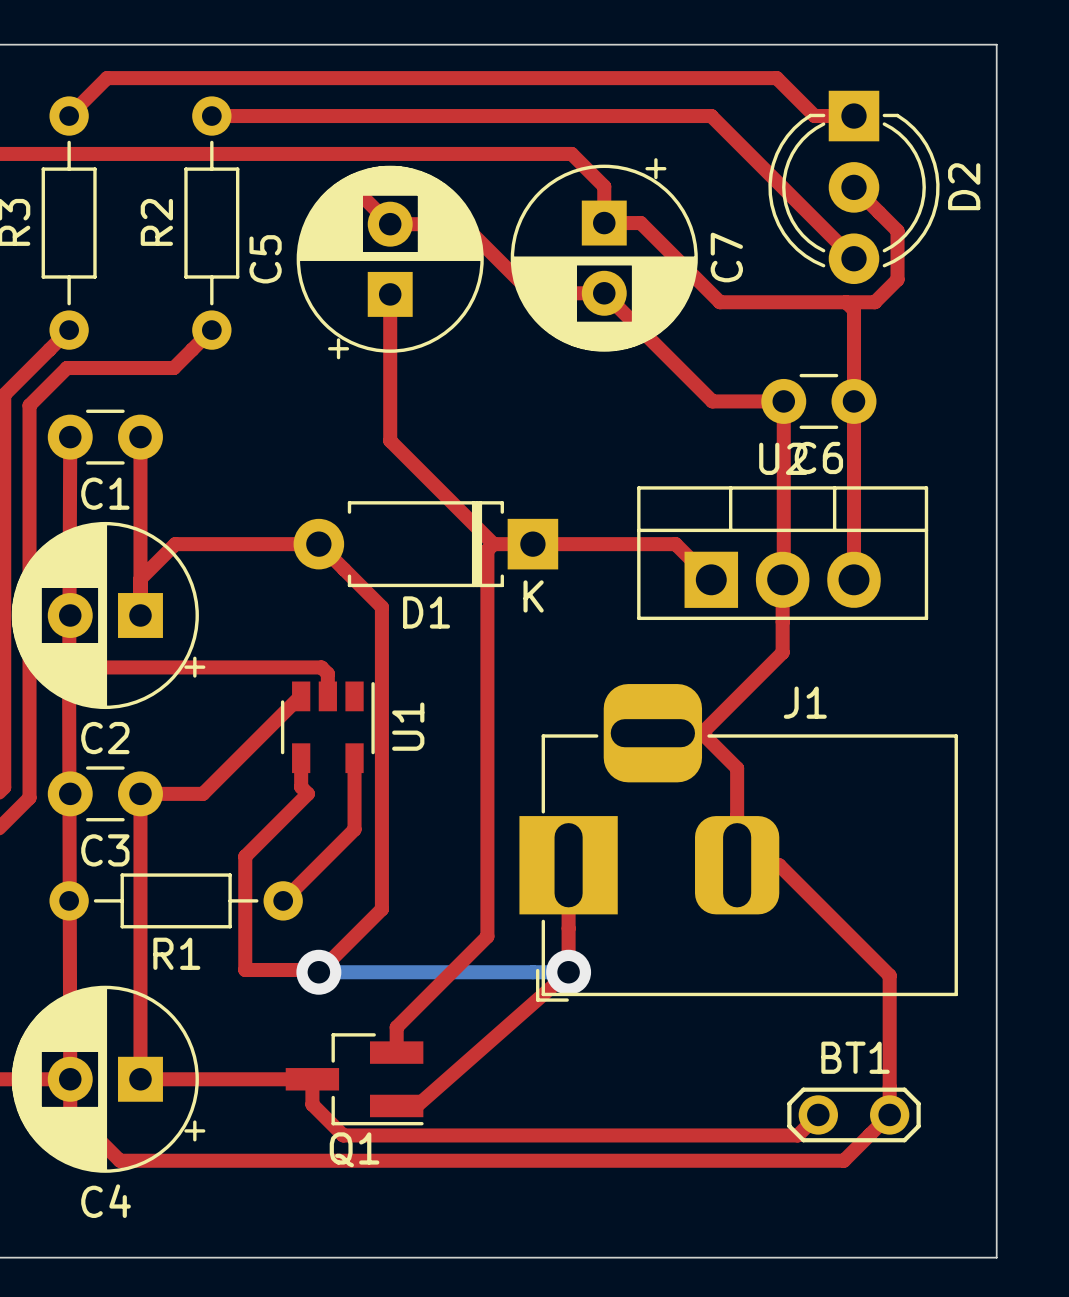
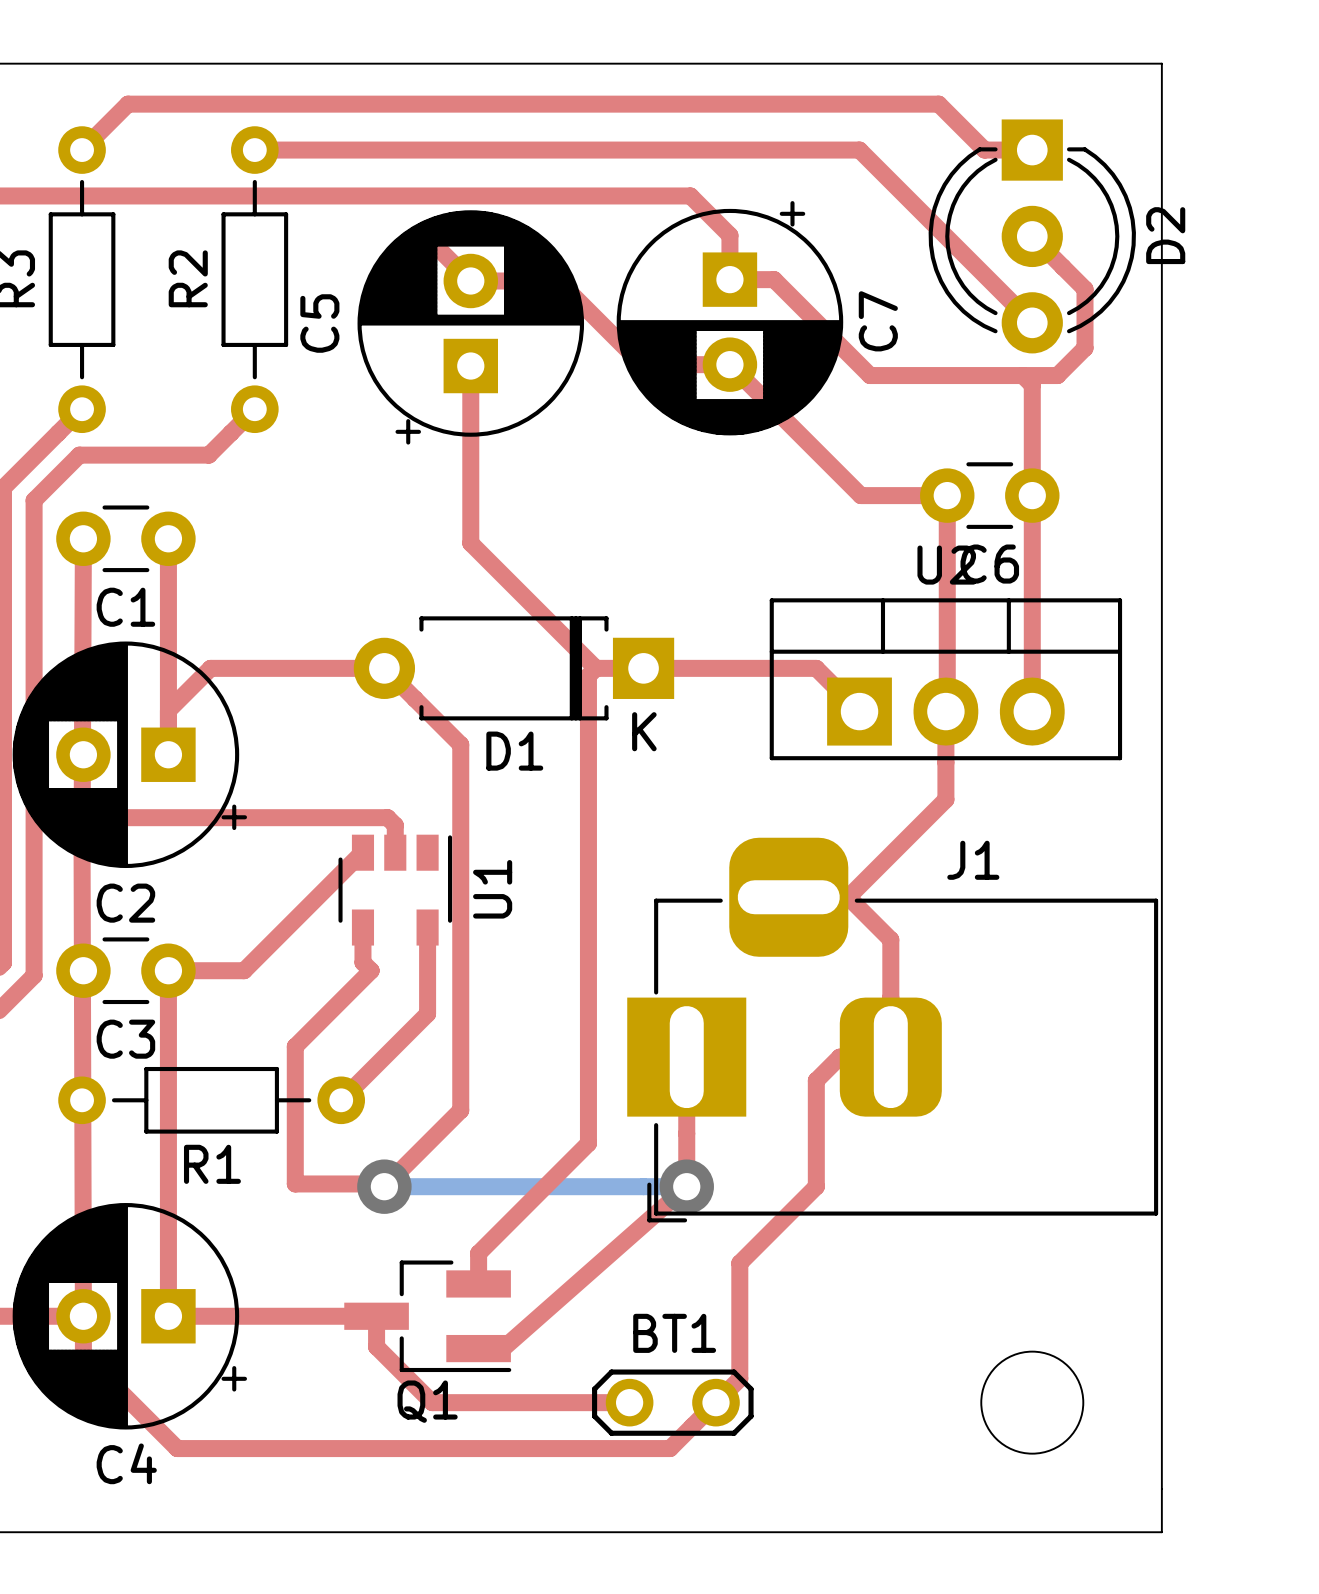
board edge: (961, 44) (996, 44) (996, 1257) (961, 1257) -> (1161, 63) (1161, 1532)
top track: (737, 865) (779, 865) (889, 975) (889, 1114) (843, 1160) (119, 1160) -> (890, 1057) (839, 1057) (816, 1080) (816, 1186) (739, 1263) (739, 1378) (670, 1448) (177, 1448) (143, 1414)
round board edge: none -> [980, 1350, 1085, 1455]
top track: (818, 1114) (797, 1135) (343, 1135) -> (629, 1402) (432, 1402) (413, 1384)
BT1 position: (854, 1114) -> (672, 1402)

